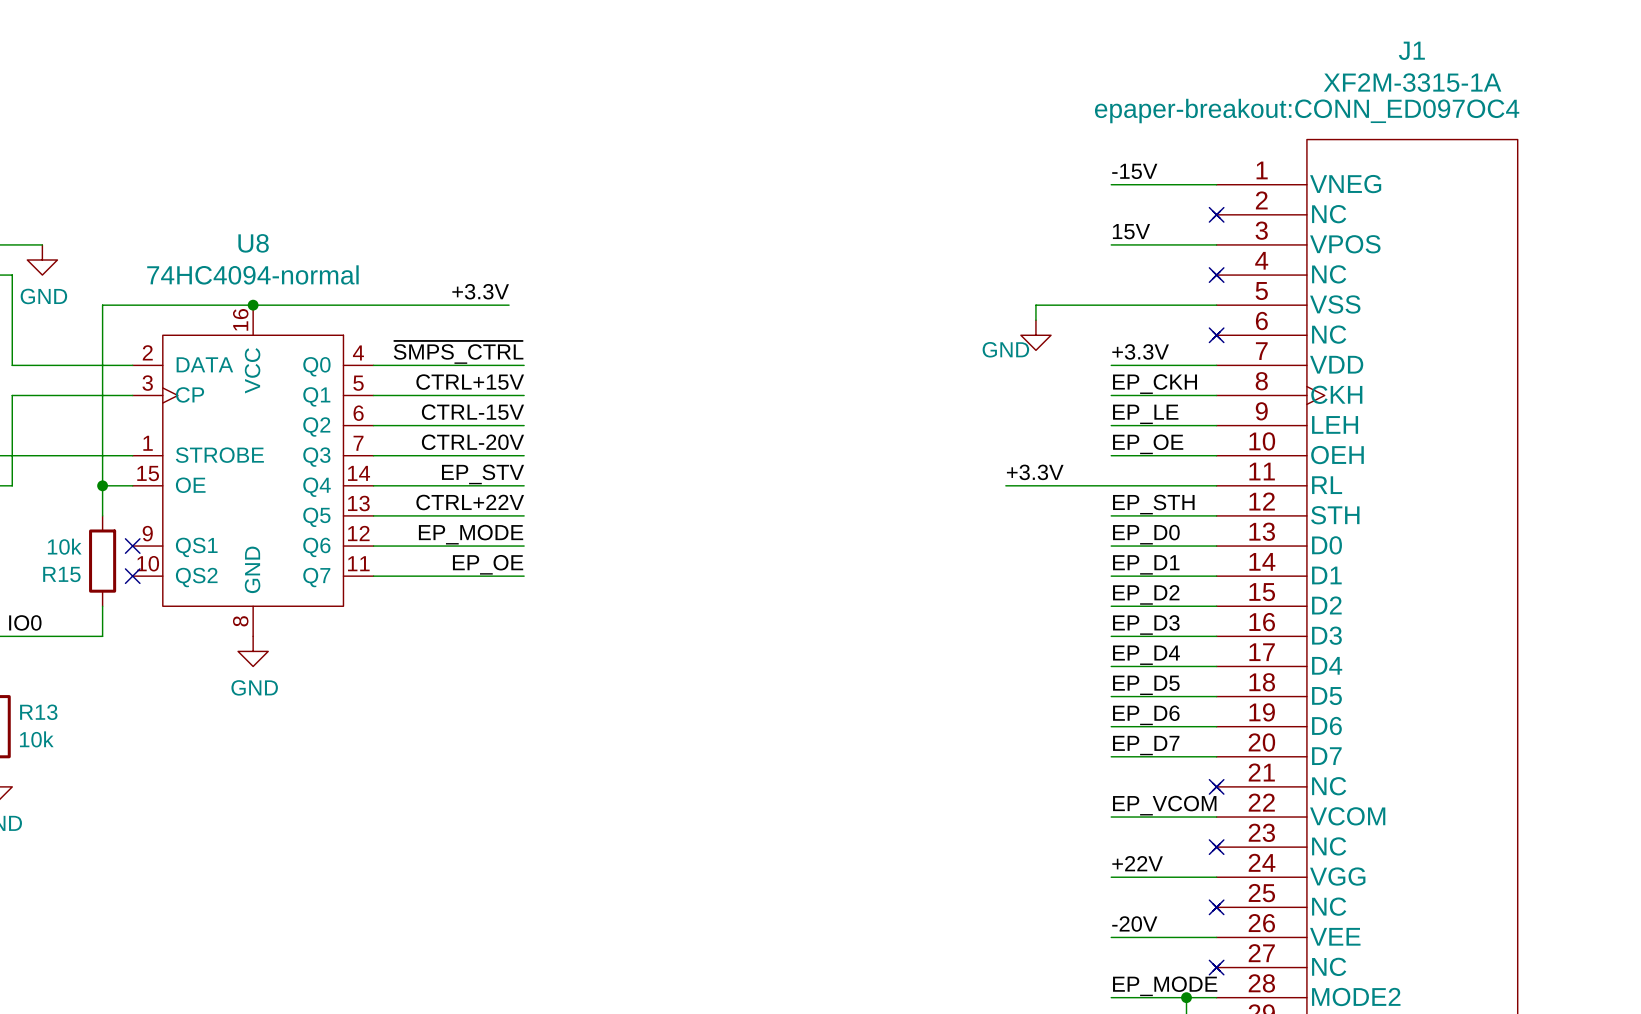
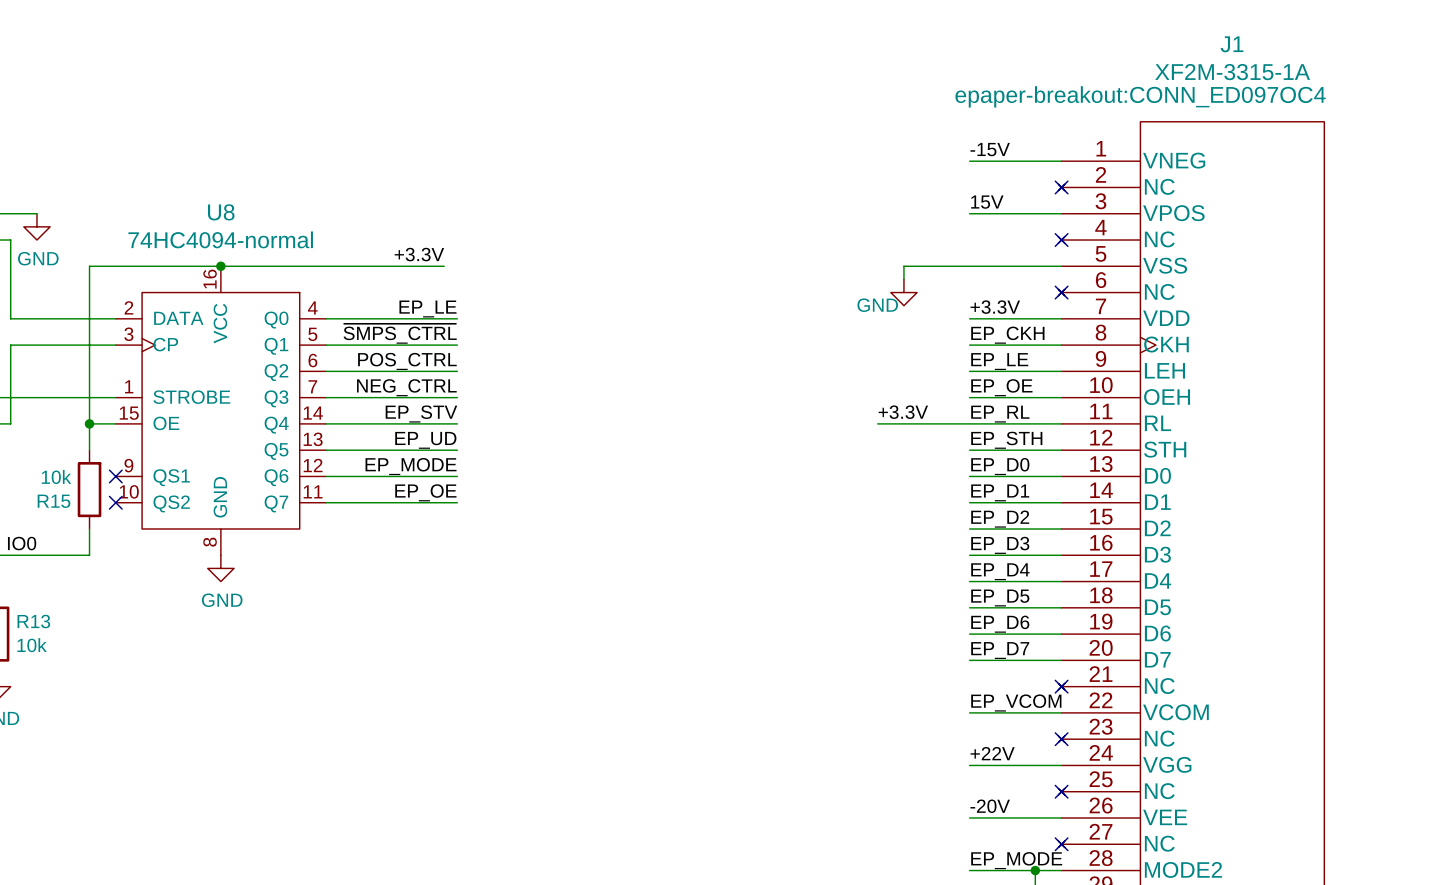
label: ~{SMPS_CTRL} (458, 352) -> EP_LE (427, 309)
label: CTRL+15V (470, 382) -> ~{SMPS_CTRL} (400, 333)
label: CTRL-15V (472, 412) -> POS_CTRL (407, 361)
label: CTRL-20V (472, 442) -> NEG_CTRL (406, 387)
label: none -> EP_RL (1000, 414)
label: CTRL+22V (470, 502) -> EP_UD (425, 440)

